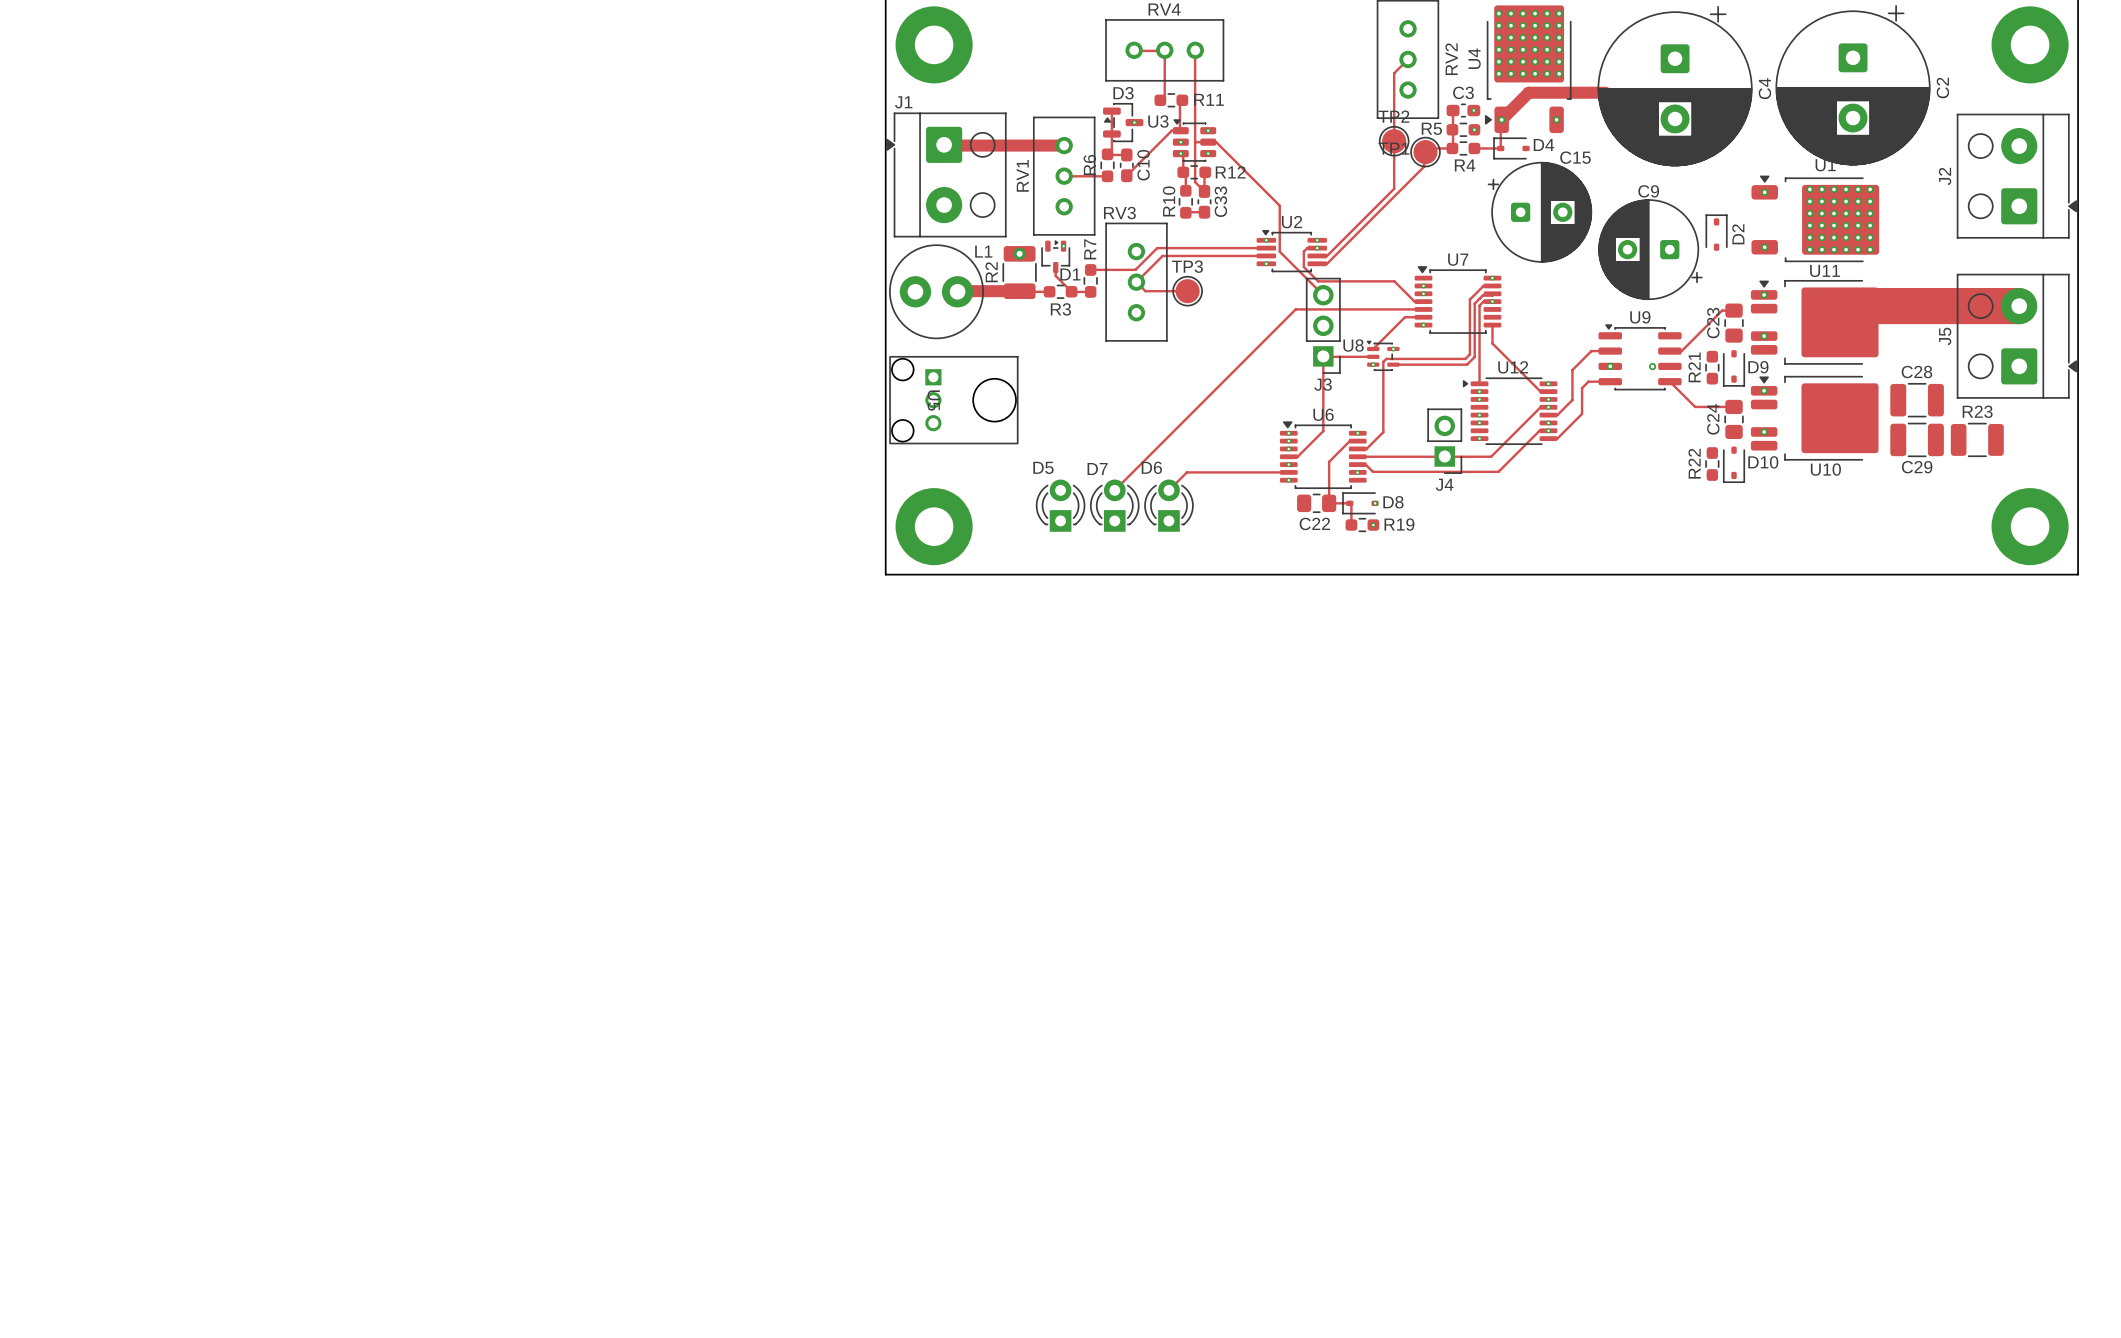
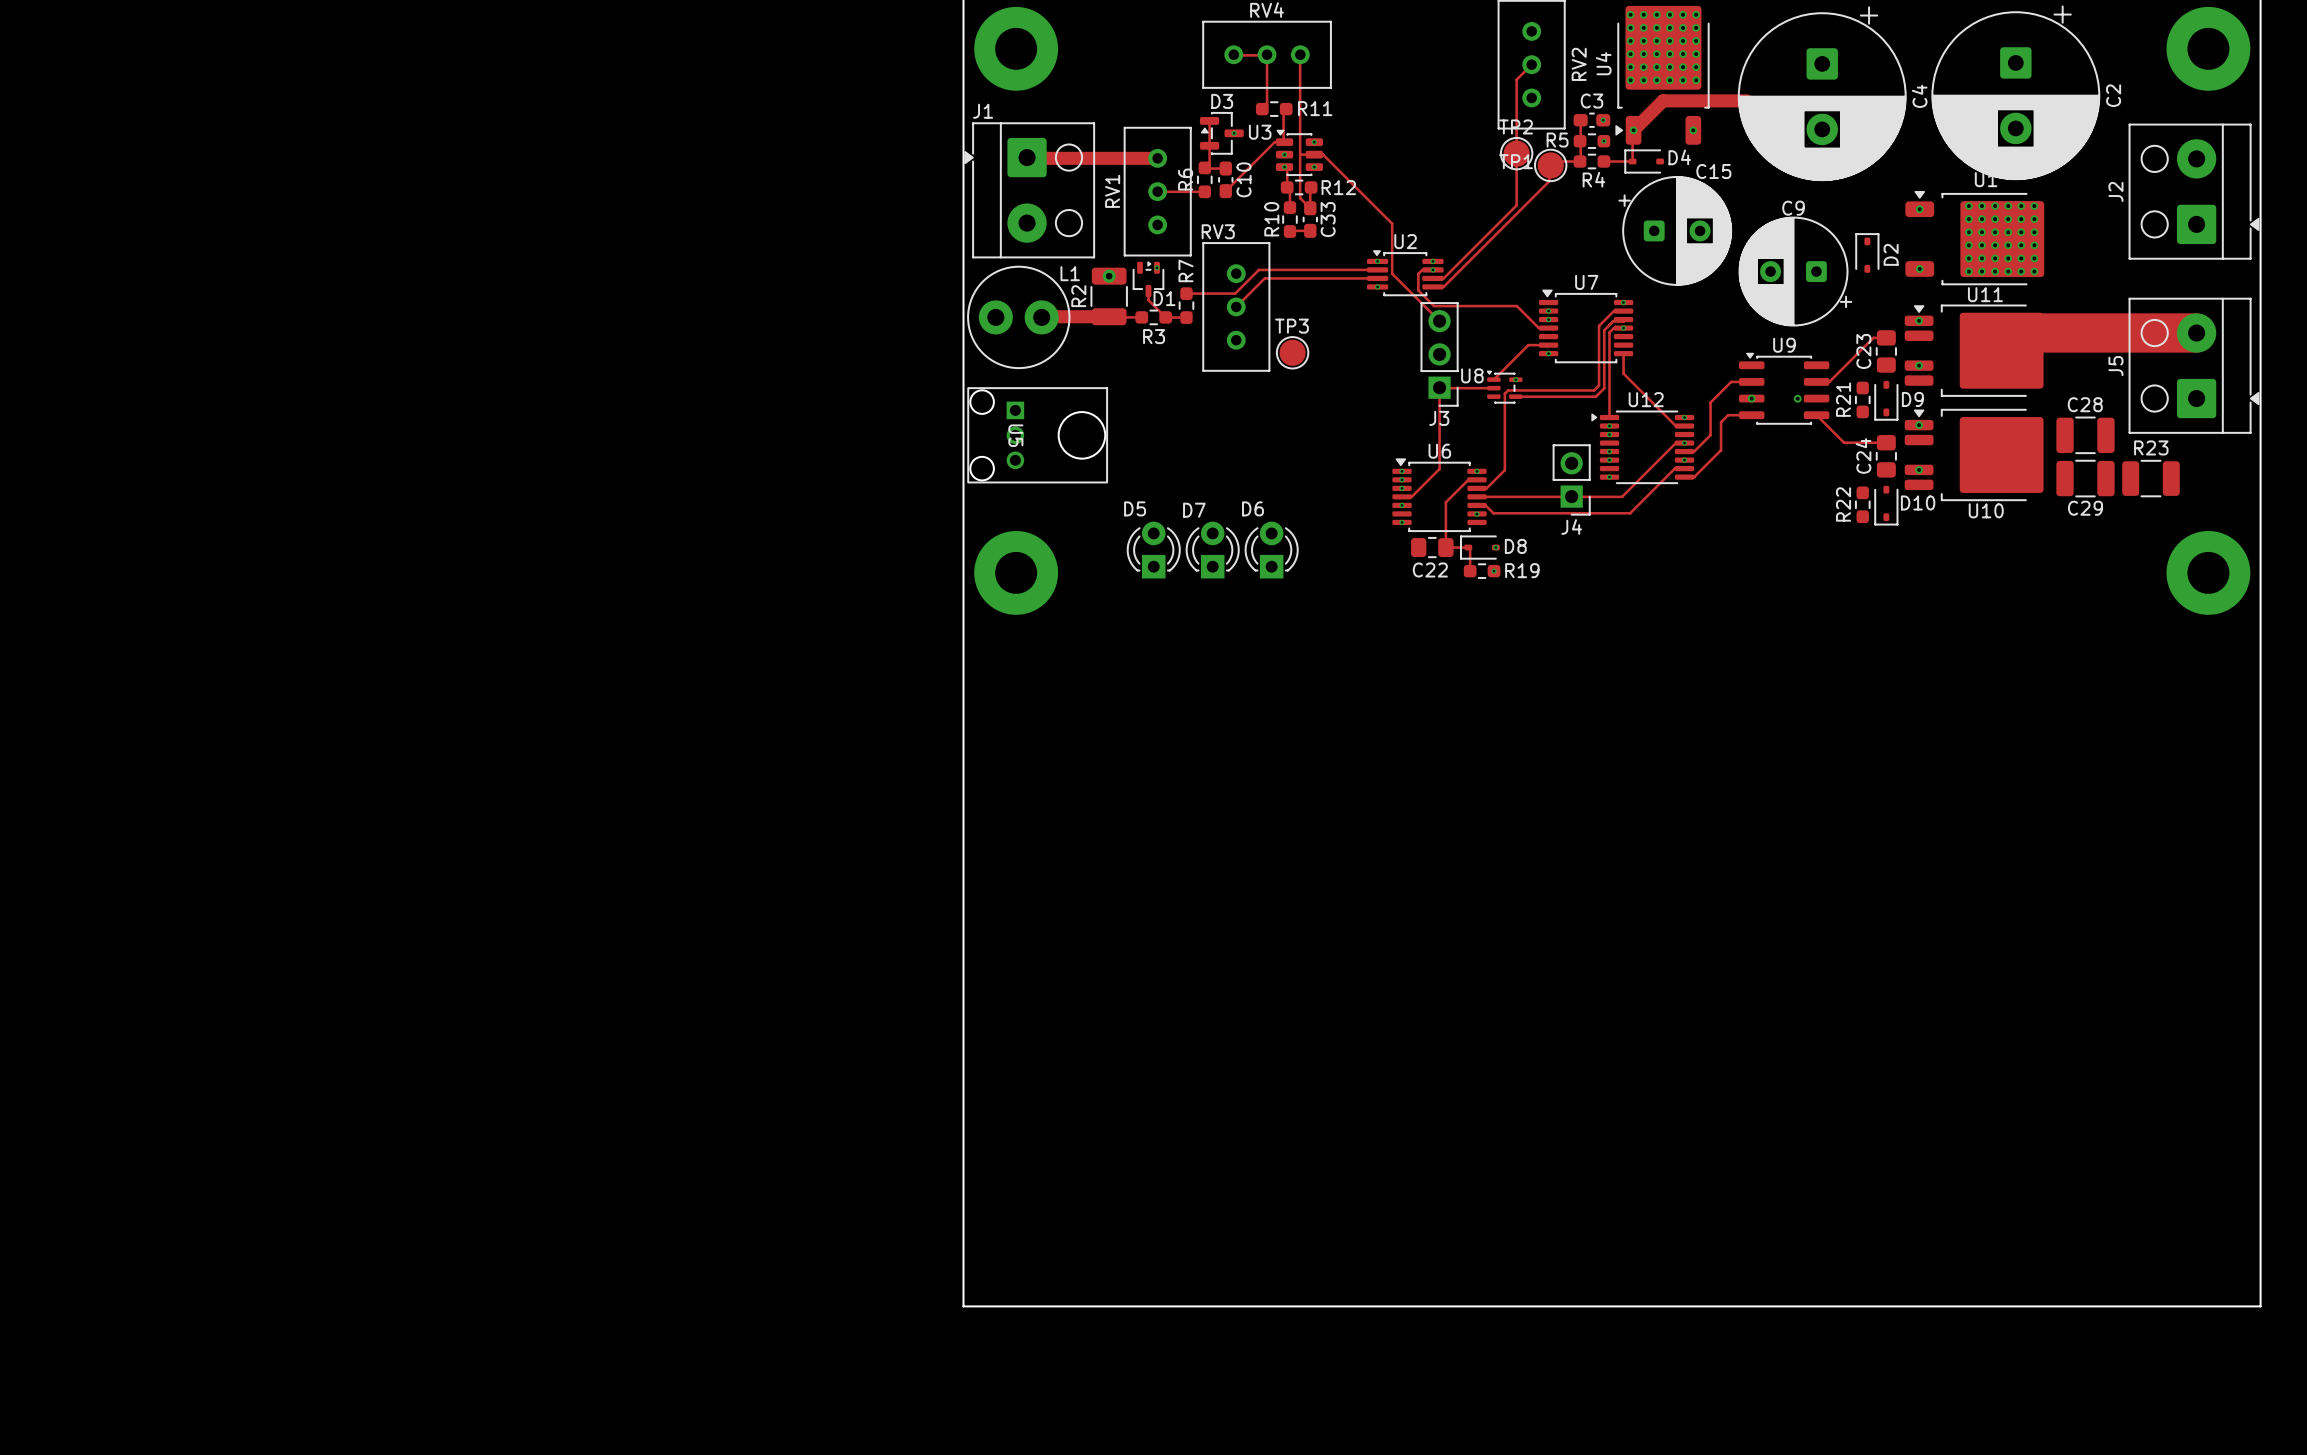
track: (1136, 282) (1145, 291) (1187, 291) -> none
TP3 position: (1187, 291) -> (1292, 352)
track: (1423, 309) (1295, 309) (1114, 490) -> none
via: (1373, 364) -> none
via: (1548, 399) -> none
via: (1548, 430) -> none
track: (1288, 472) (1186, 472) (1168, 490) -> none
board edge: (885, 574) (2078, 574) -> (963, 625) (963, 1306) (2260, 1306) (2260, 625)

